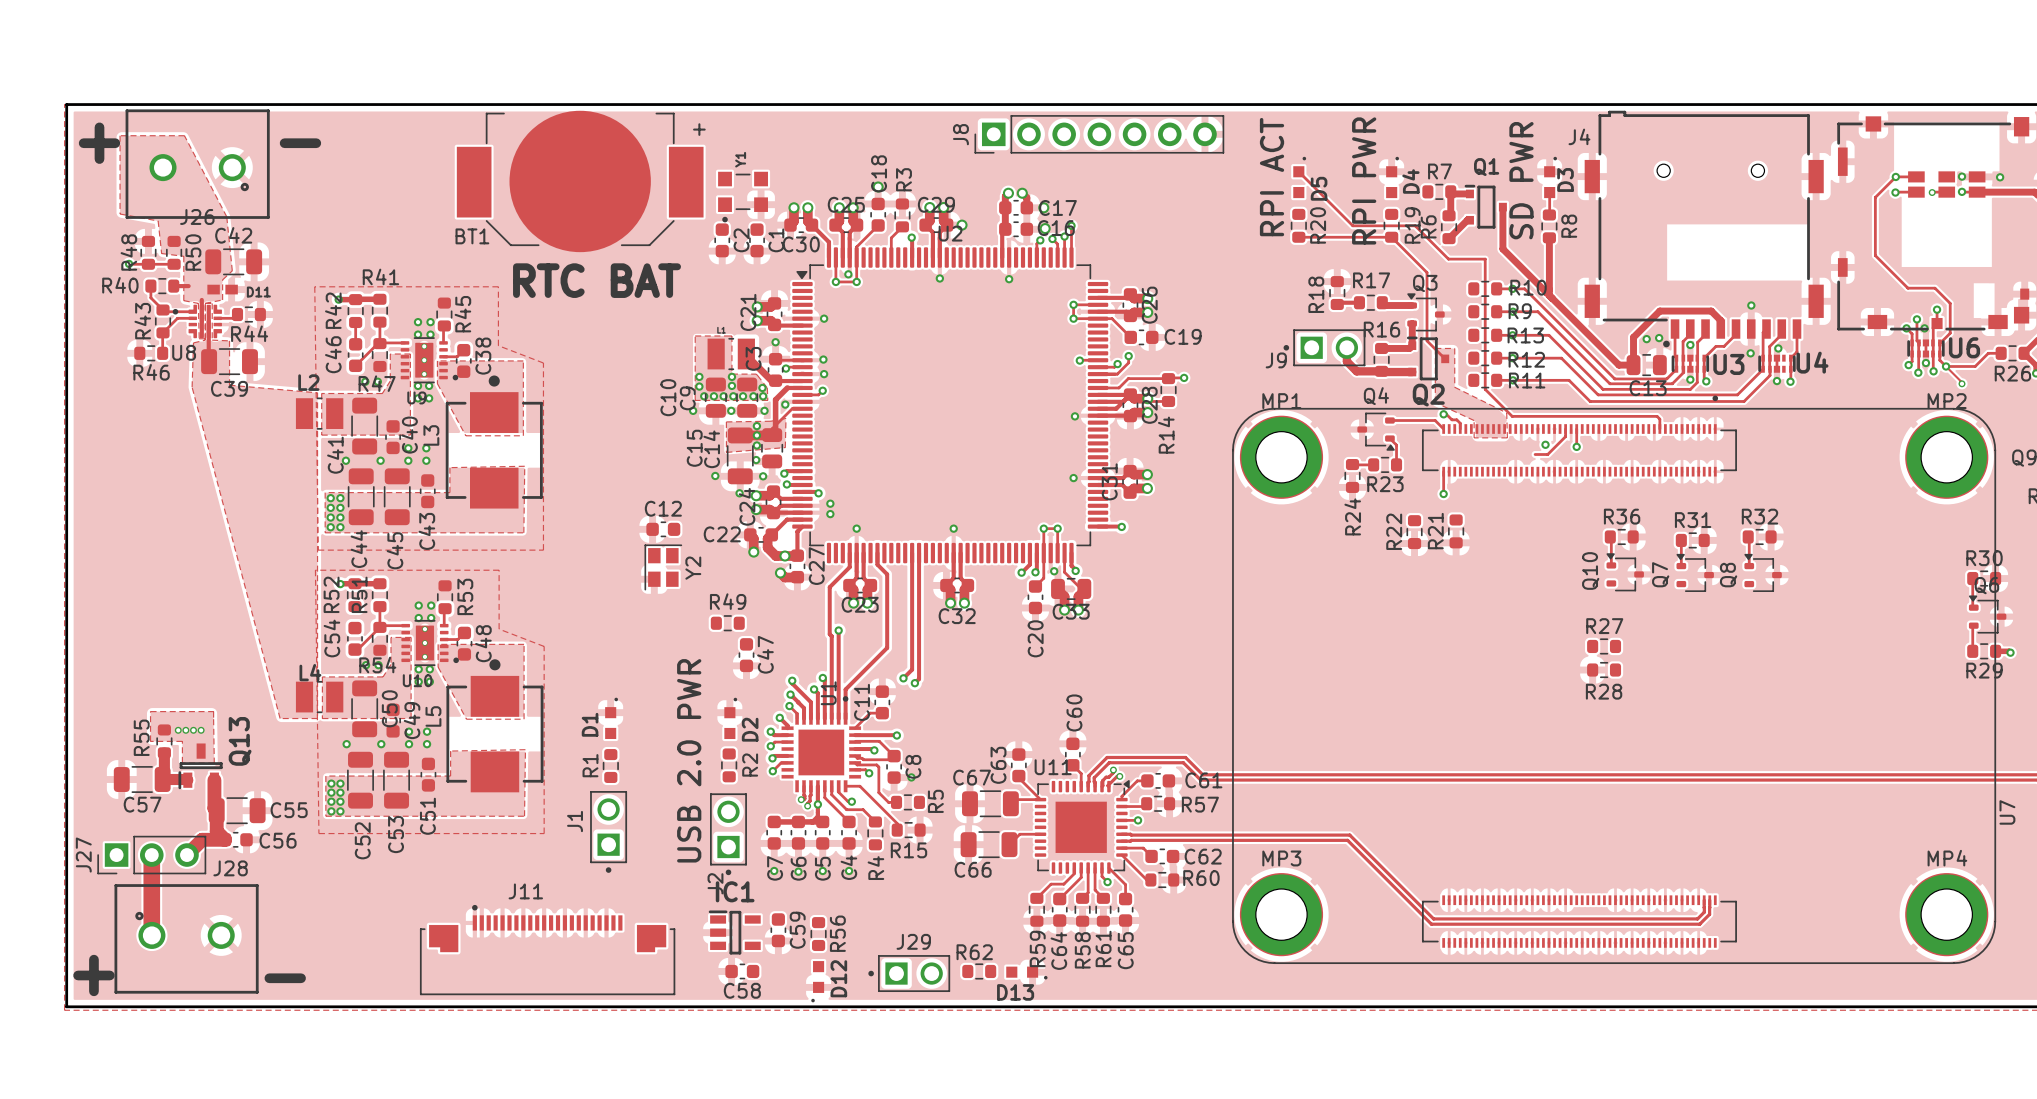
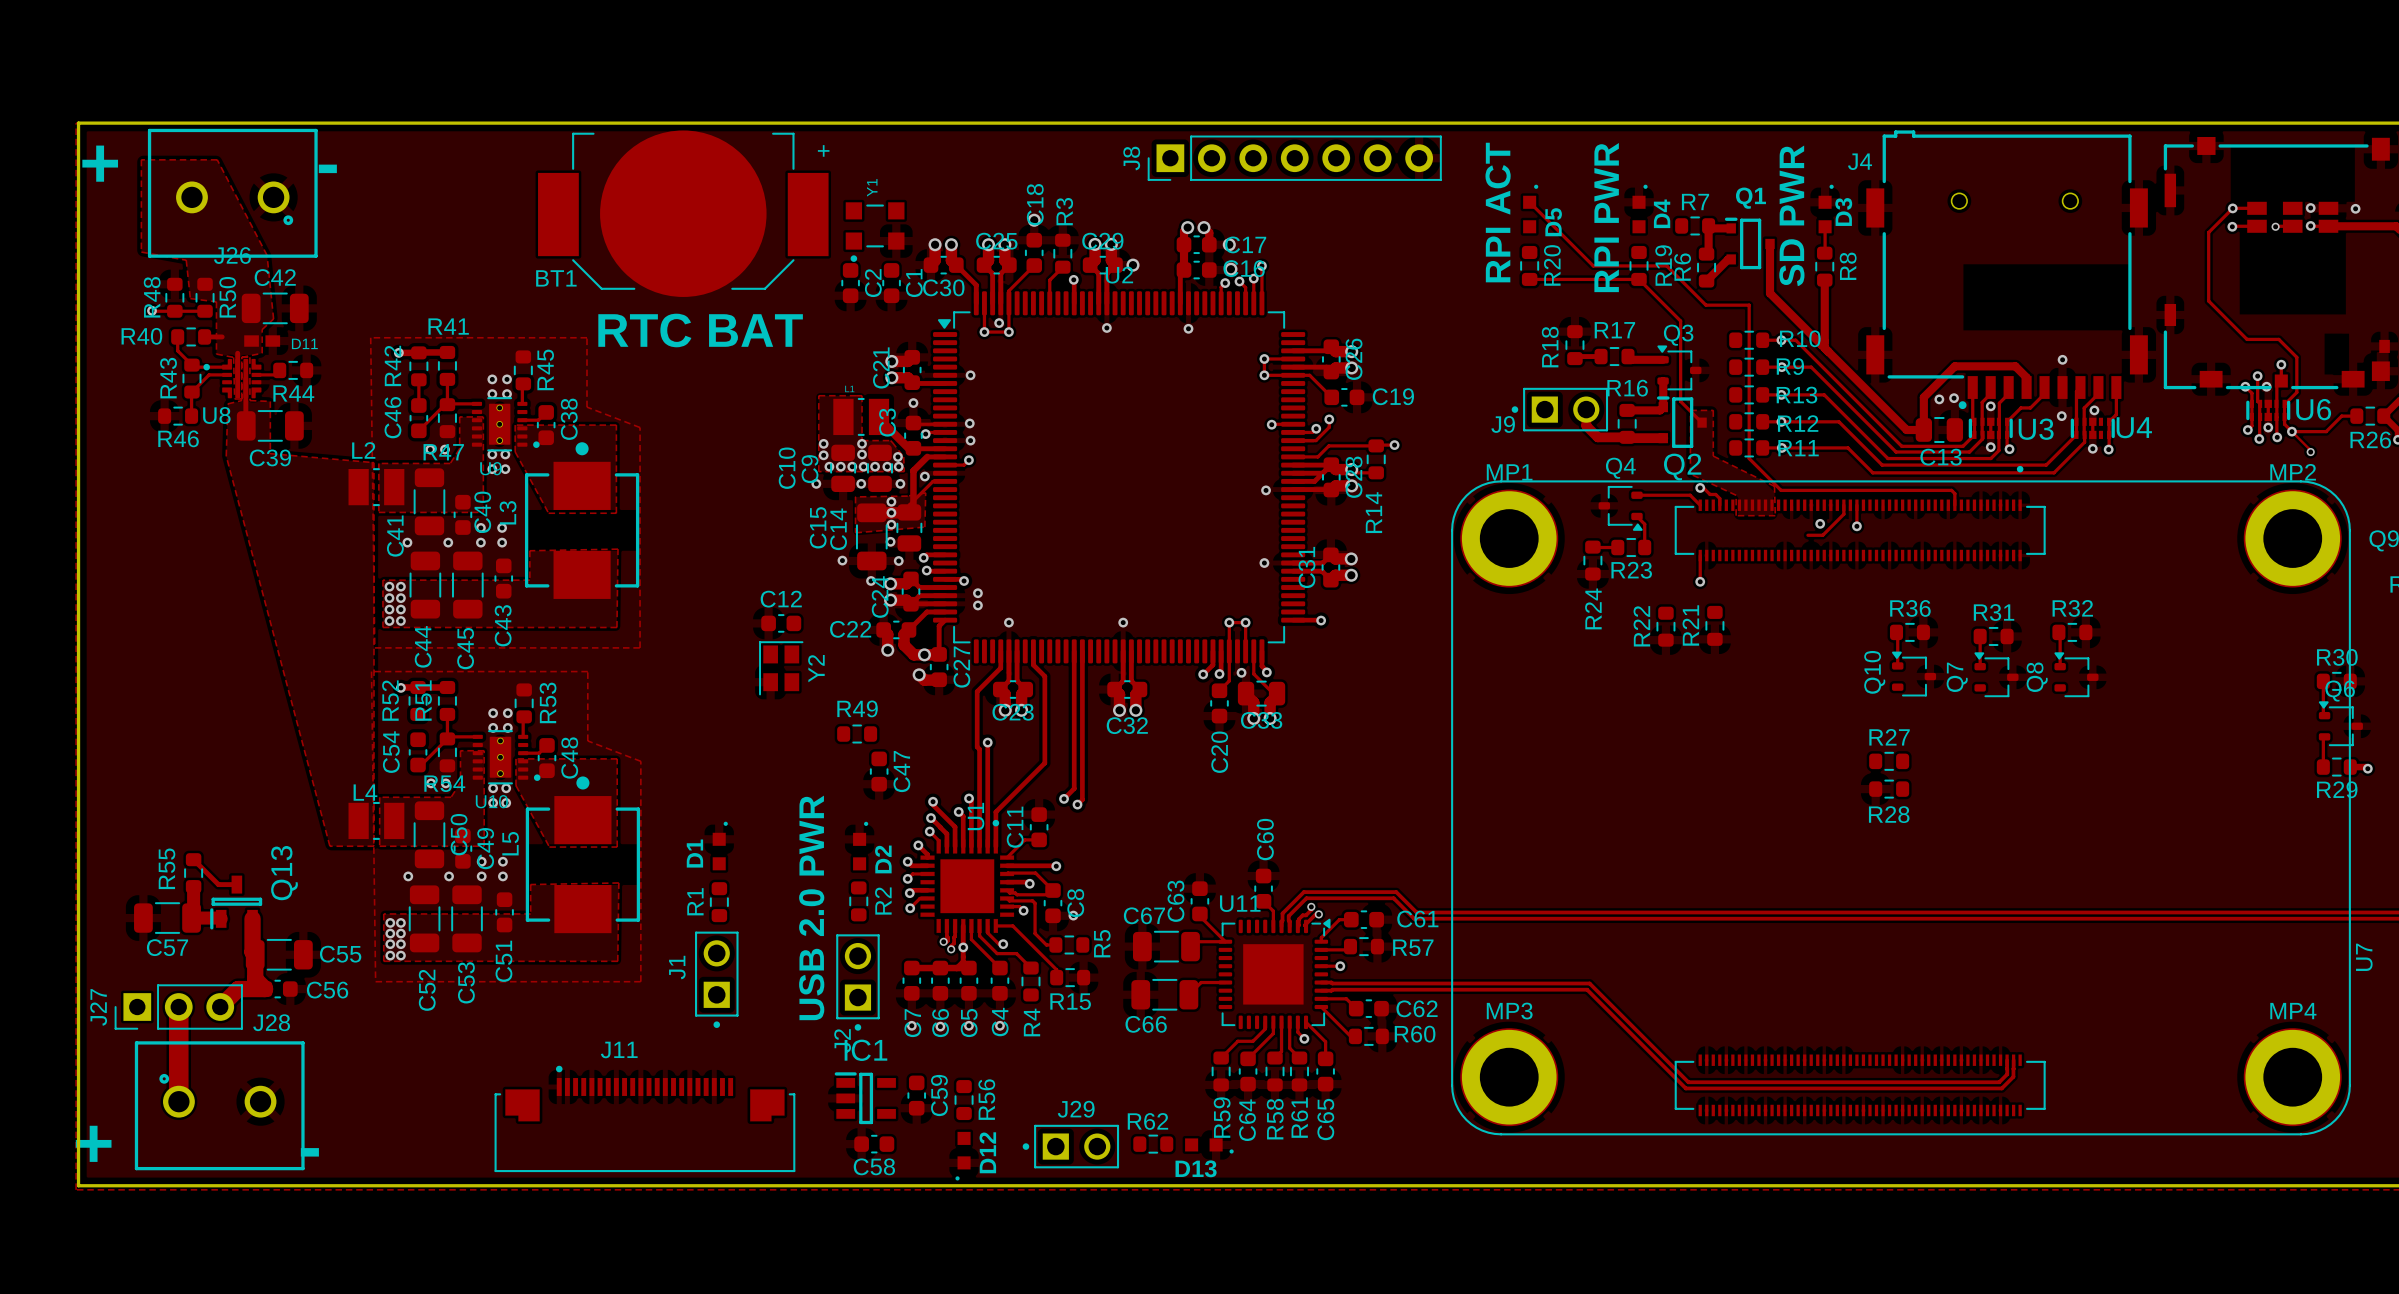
zone outline: (150, 711) (150, 741) (182, 741) (182, 762) (214, 762) (213, 711) (150, 711) -> none
track: none -> (193, 859) (218, 884) (236, 884)
via: (178, 730) -> none
via: (185, 730) -> none
via: (193, 730) -> none
via: (201, 730) -> none

